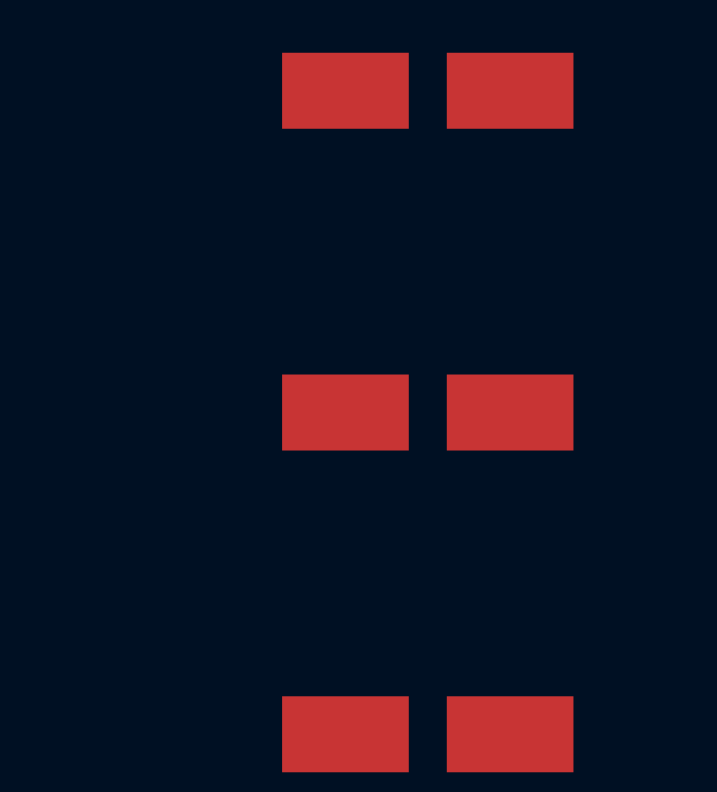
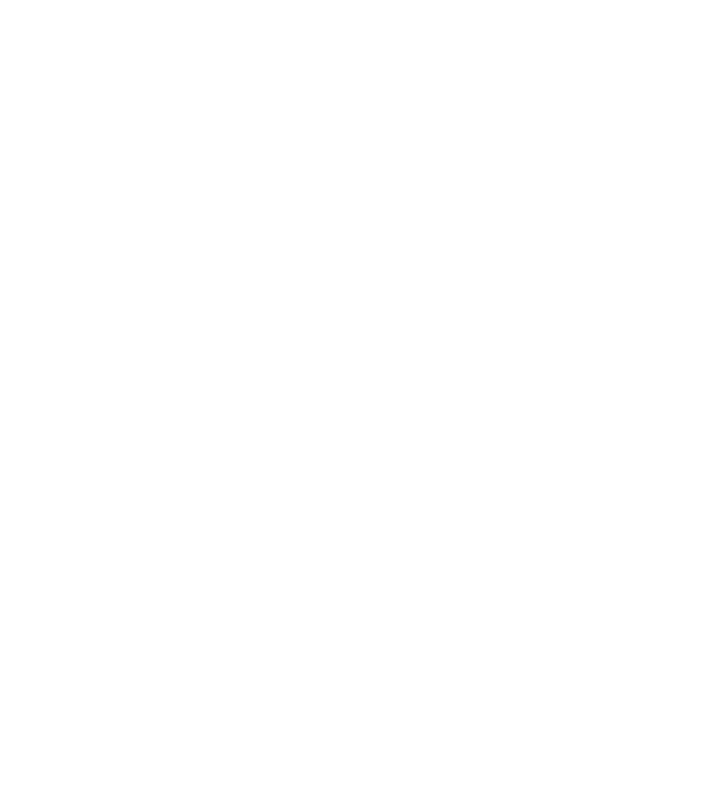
part: (427, 90) -> none
part: (427, 412) -> none
part: (427, 734) -> none

